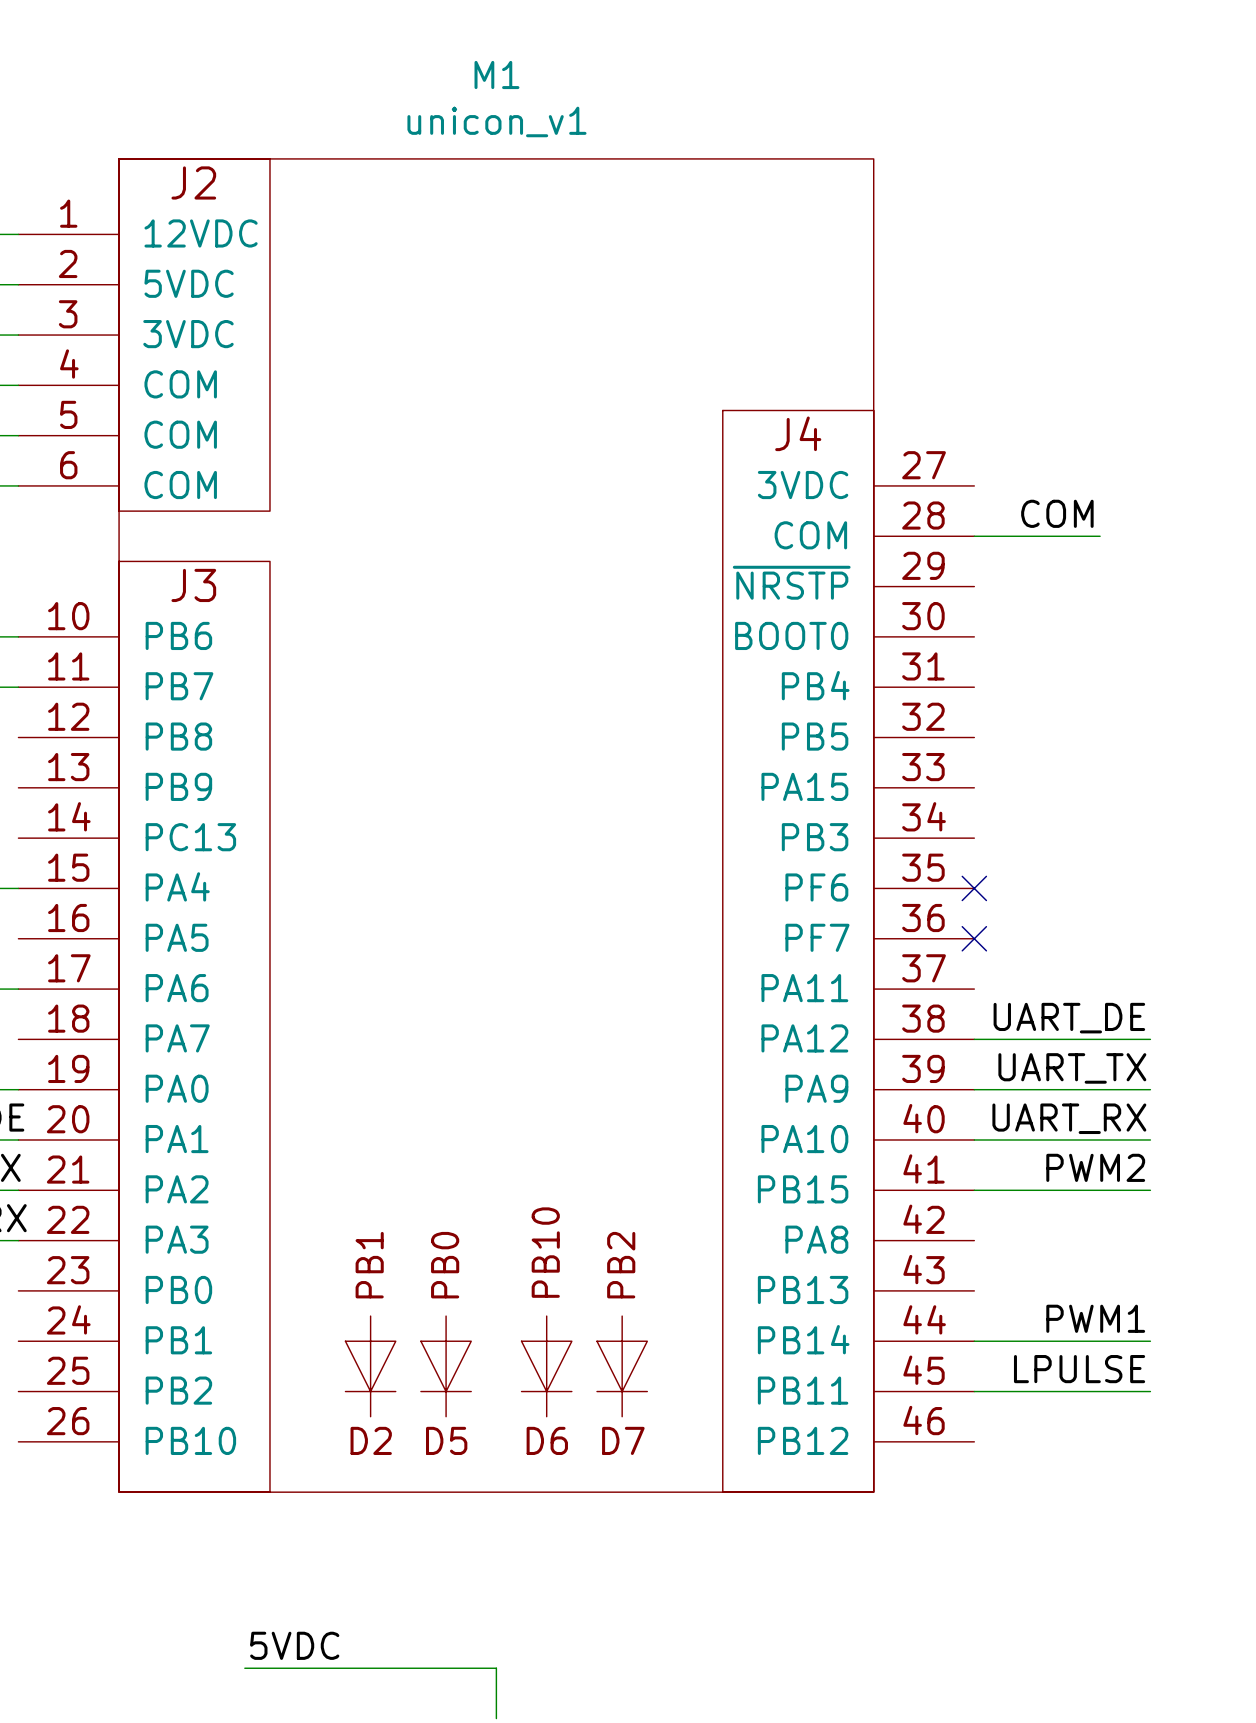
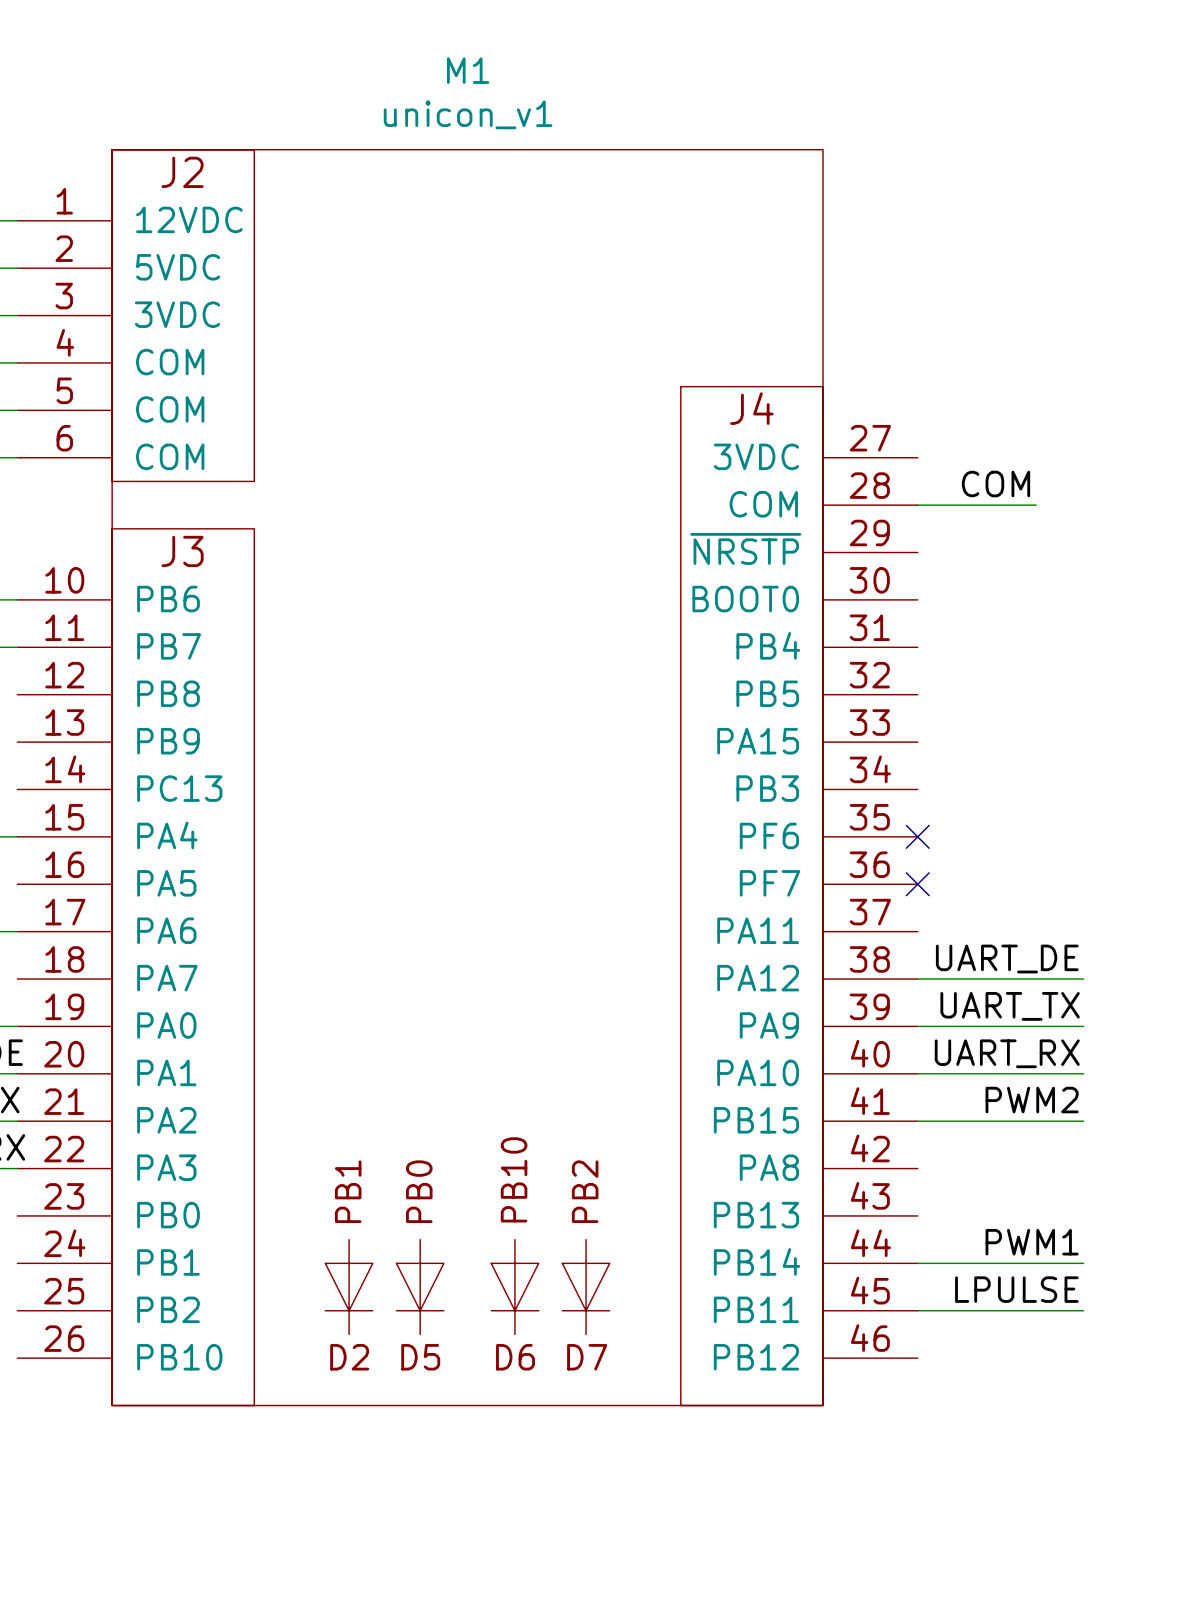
label: 5VDC (294, 1645) -> none
wire: (244, 1668) (496, 1668) (496, 1718) -> none

